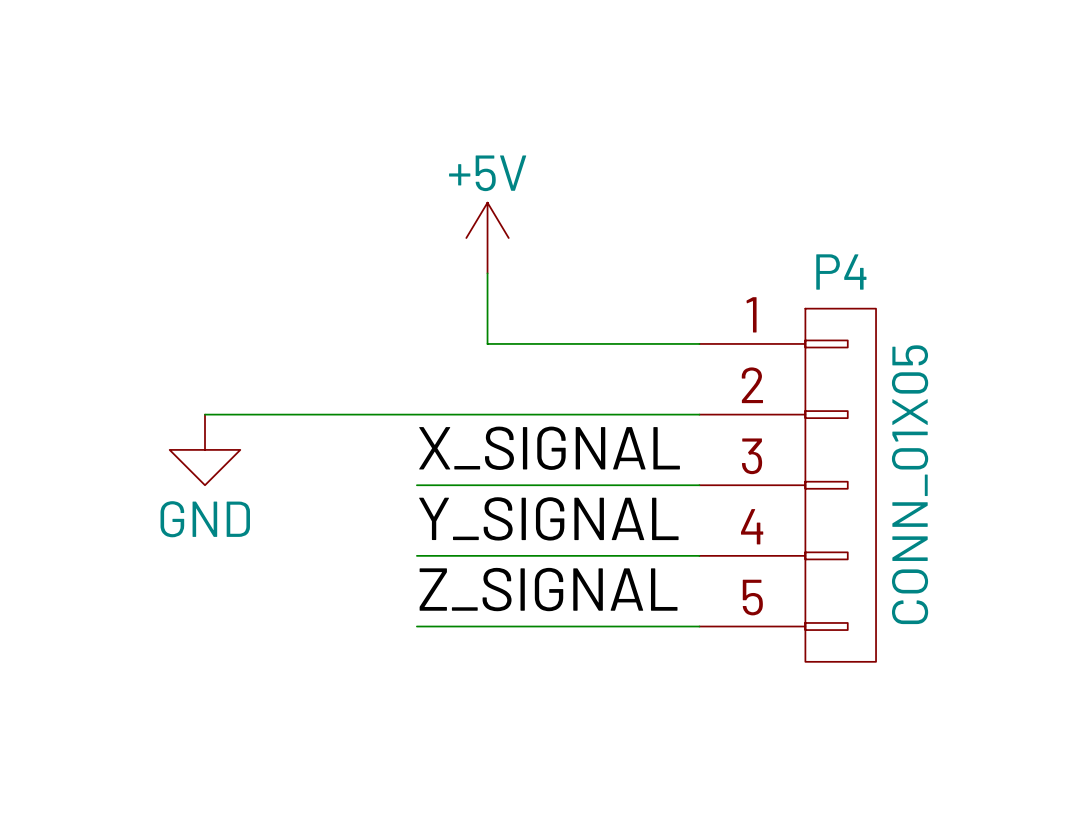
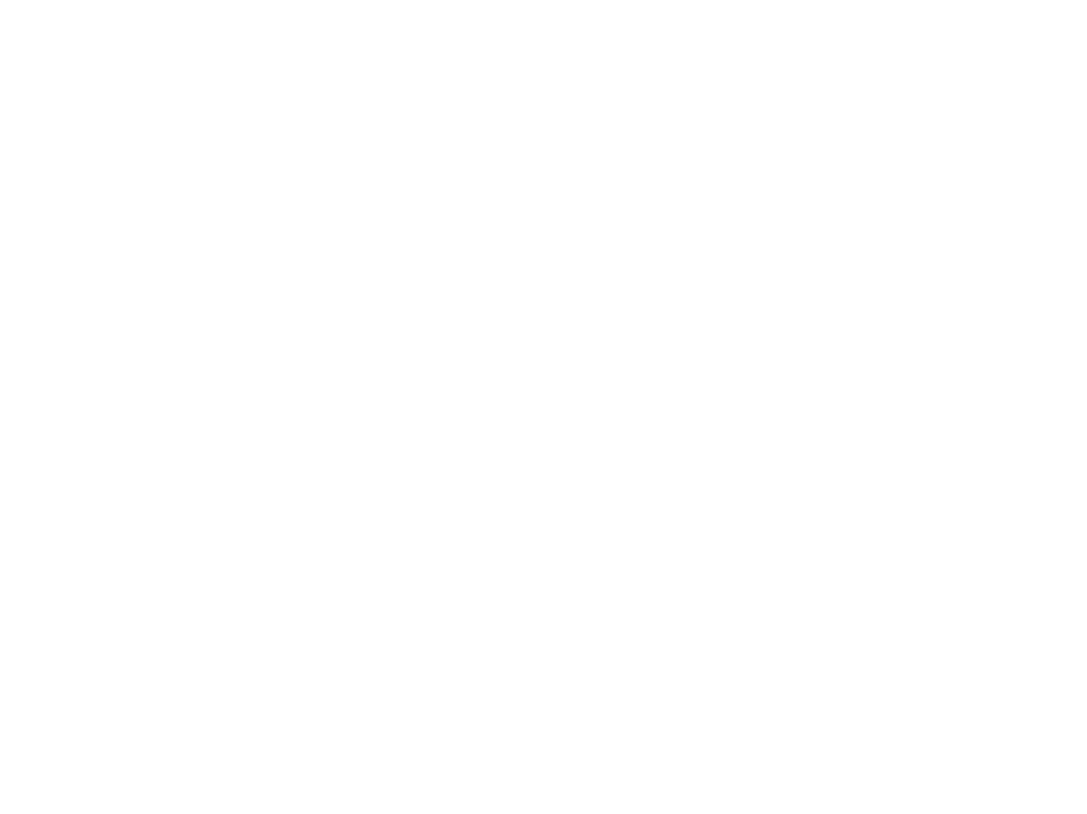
power symbol: +5V (487, 238) -> none
wire: (487, 273) (487, 343) (699, 343) -> none
wire: (204, 414) (699, 414) -> none
label: X_SIGNAL (549, 448) -> none
power symbol: GND (204, 449) -> none
wire: (416, 485) (699, 485) -> none
P4: CONN_01X05 (787, 485) -> none
label: Y_SIGNAL (548, 518) -> none
wire: (416, 555) (699, 555) -> none
label: Z_SIGNAL (548, 589) -> none
wire: (416, 626) (699, 626) -> none

